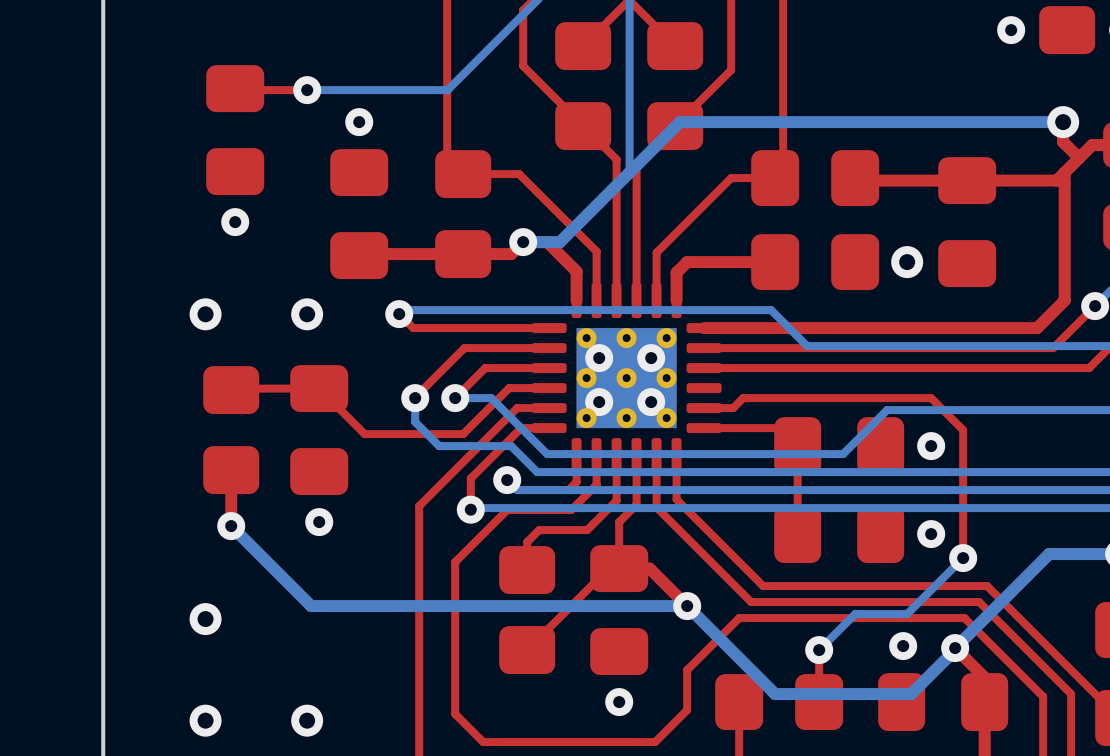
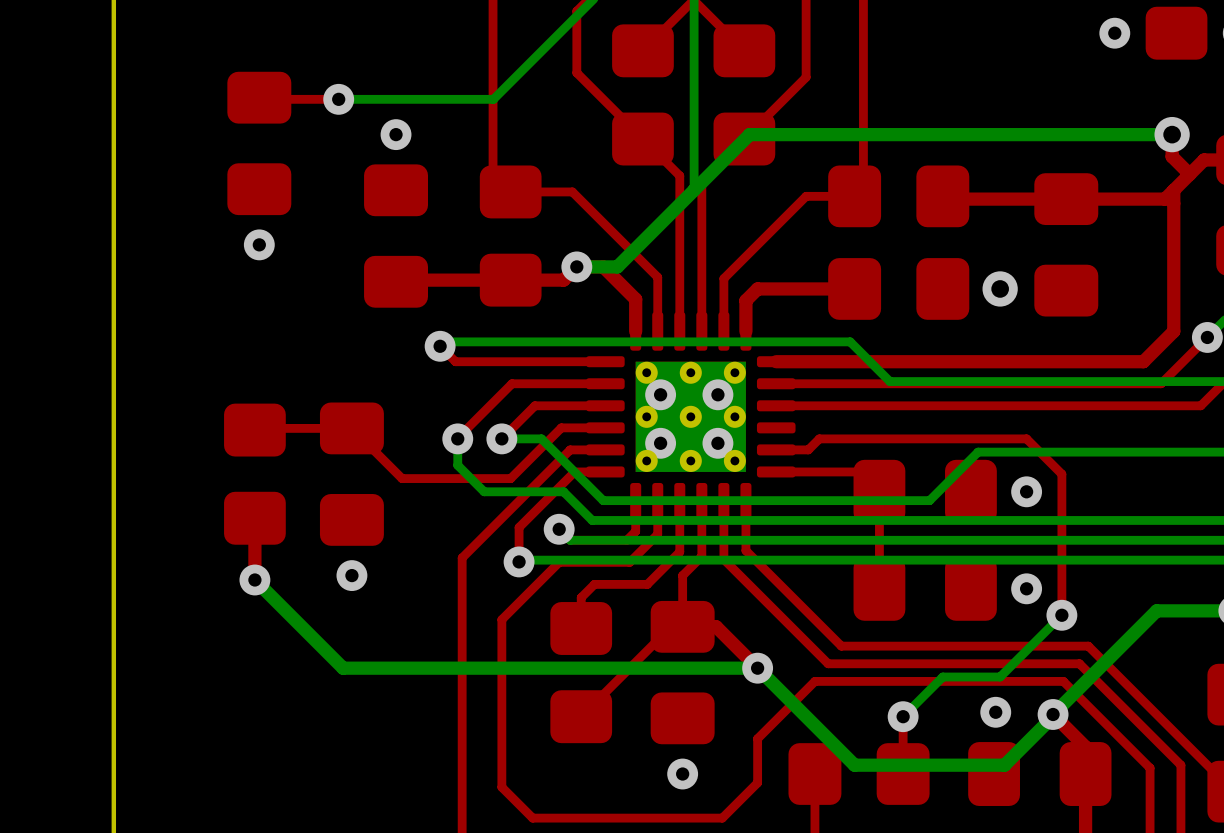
via: (205, 314) -> none
via: (307, 314) -> none
via: (205, 619) -> none
via: (205, 720) -> none
via: (307, 720) -> none

